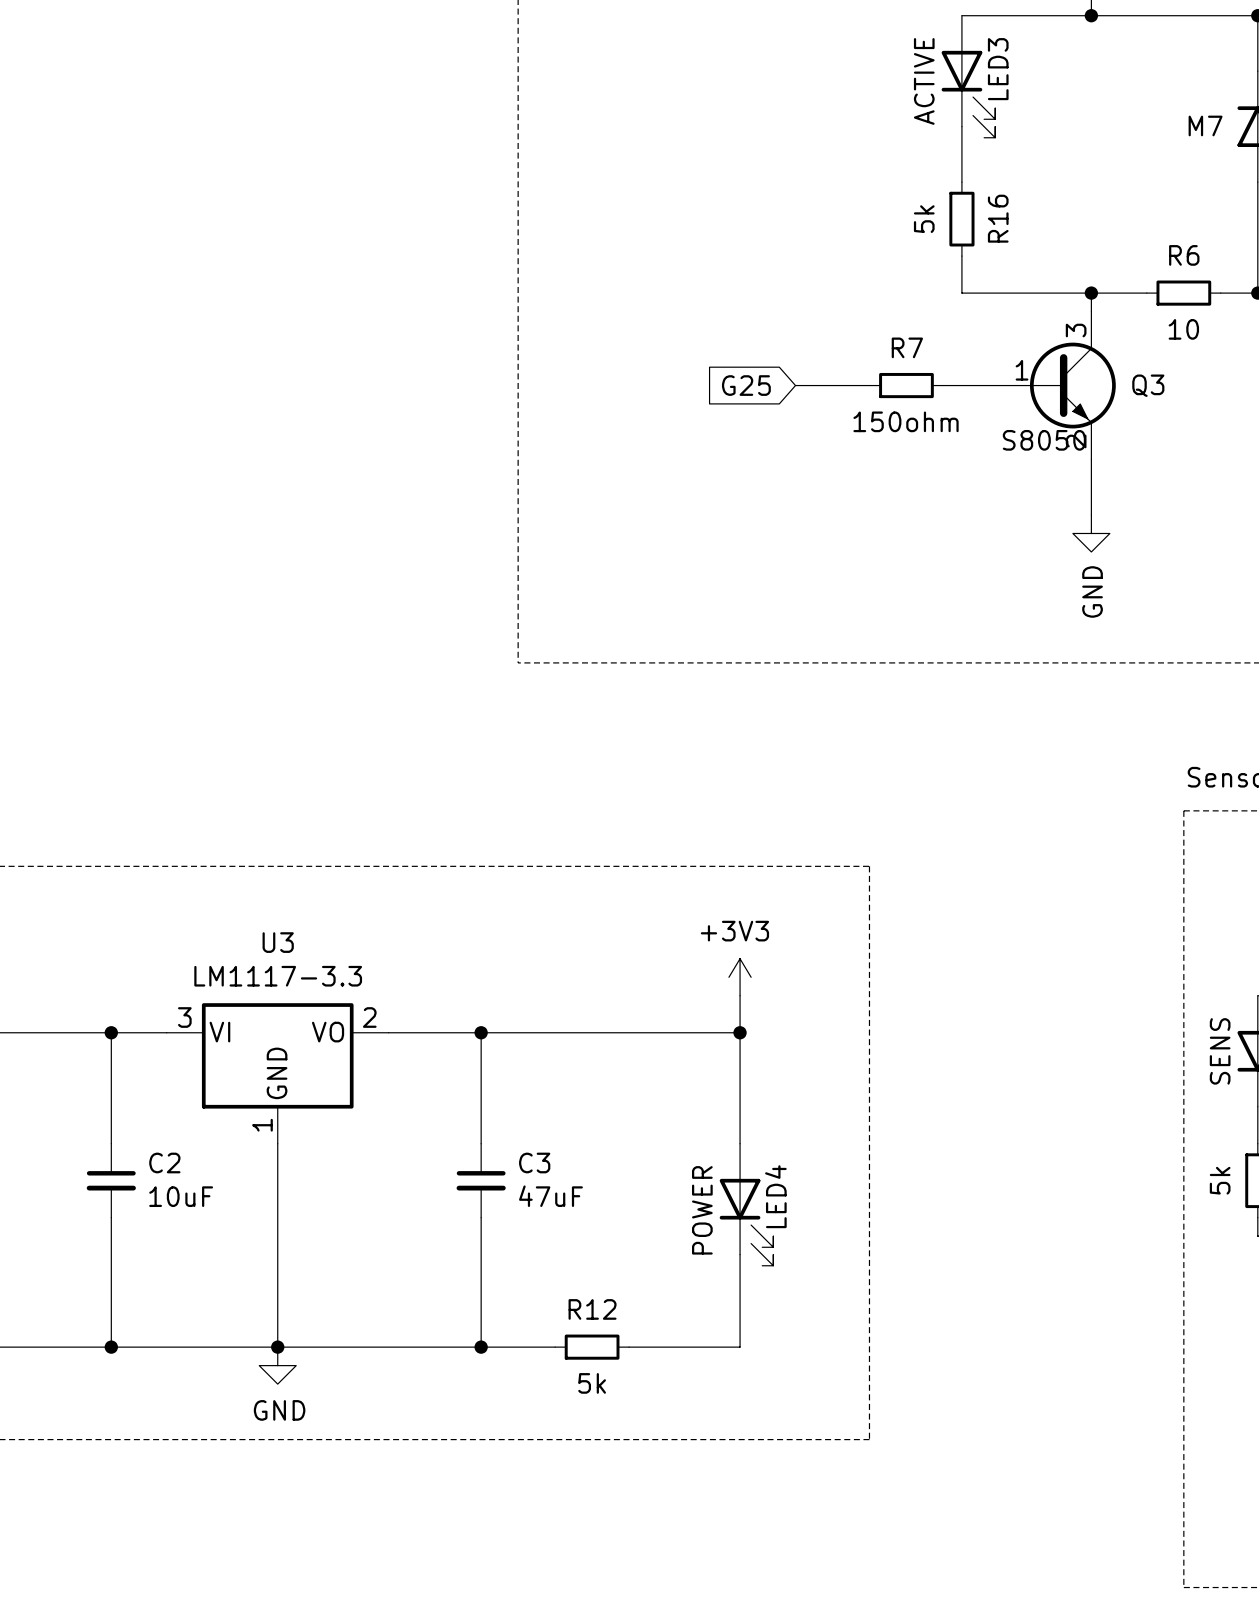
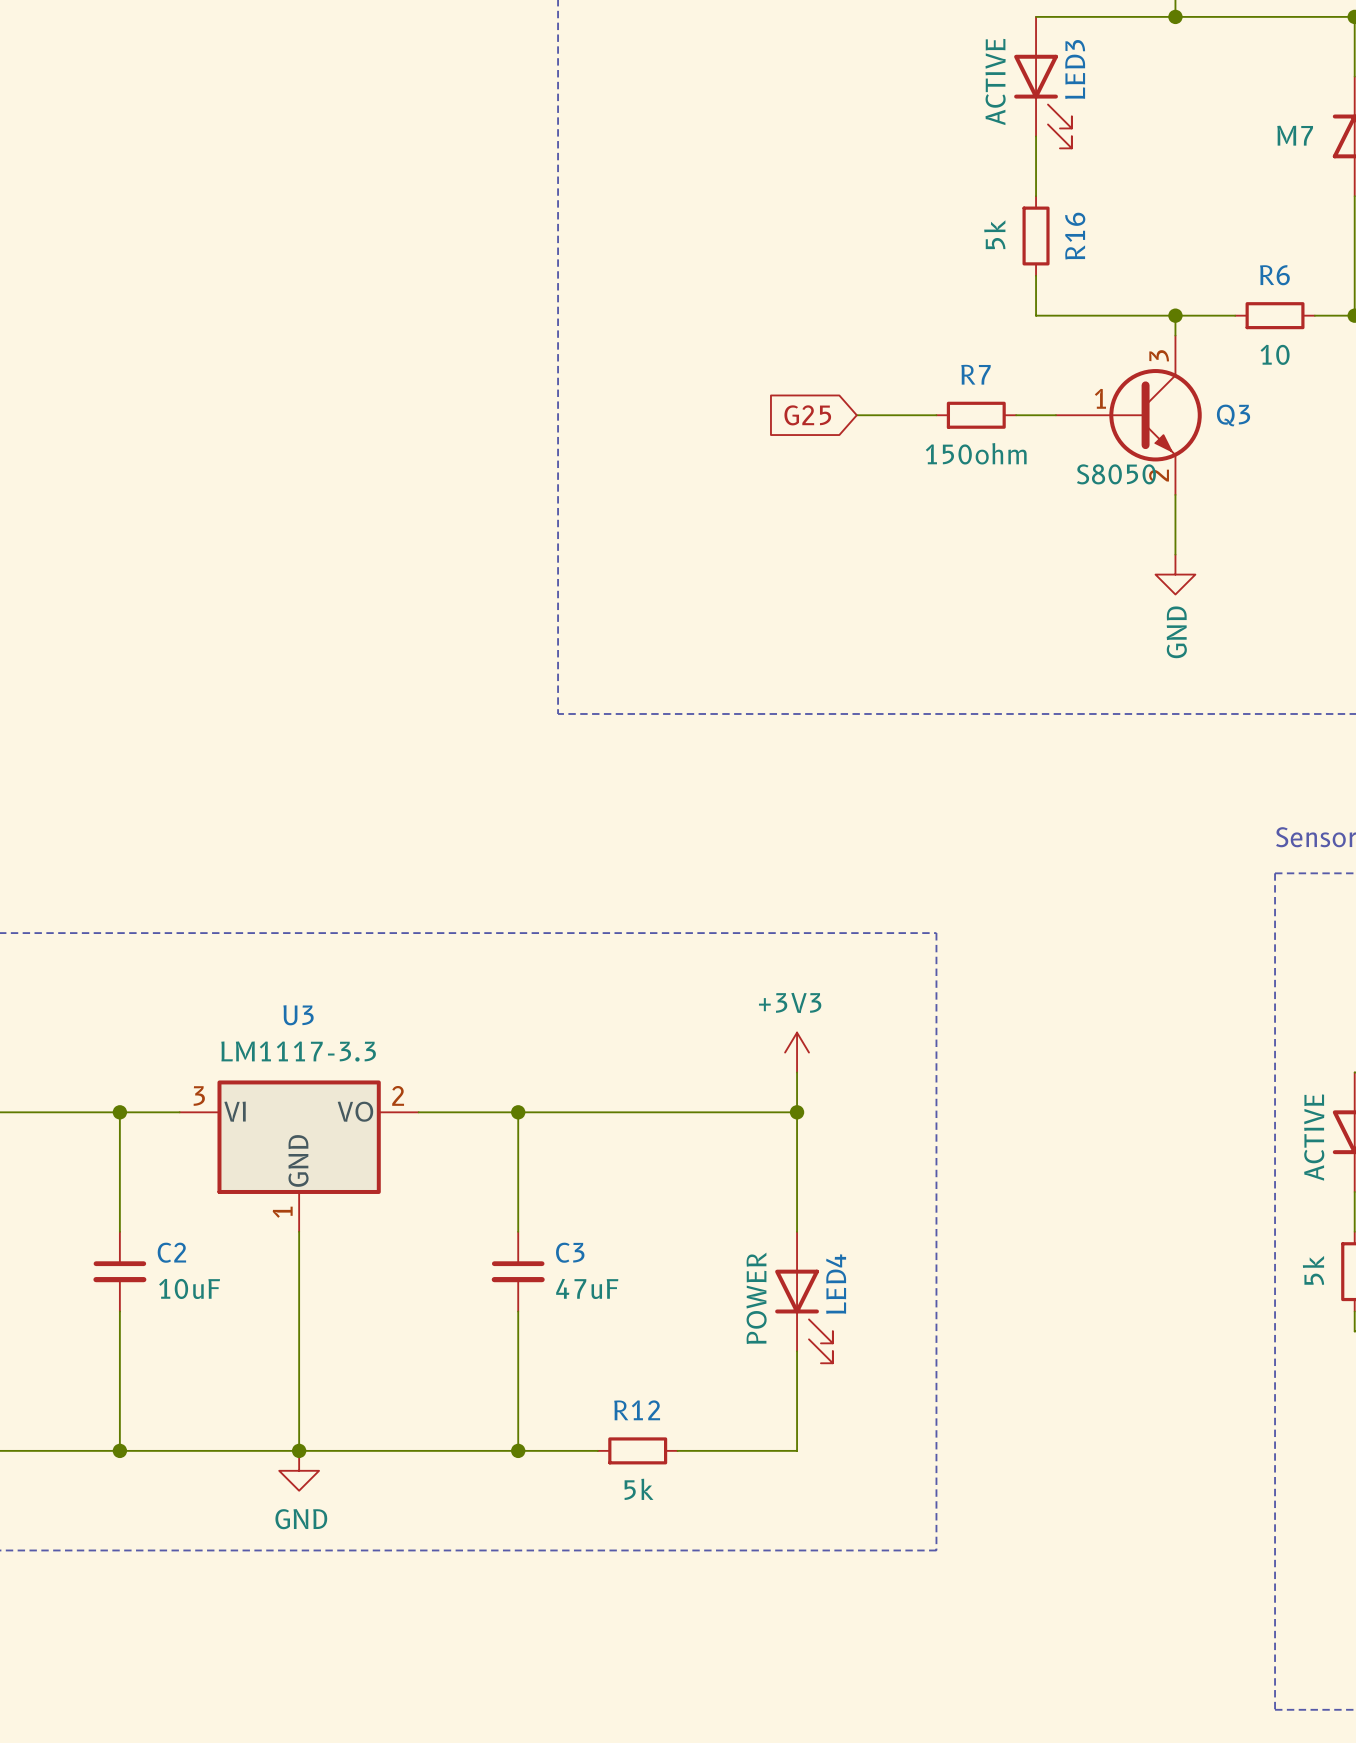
part value: SENS (1220, 1051) -> ACTIVE (1314, 1137)

